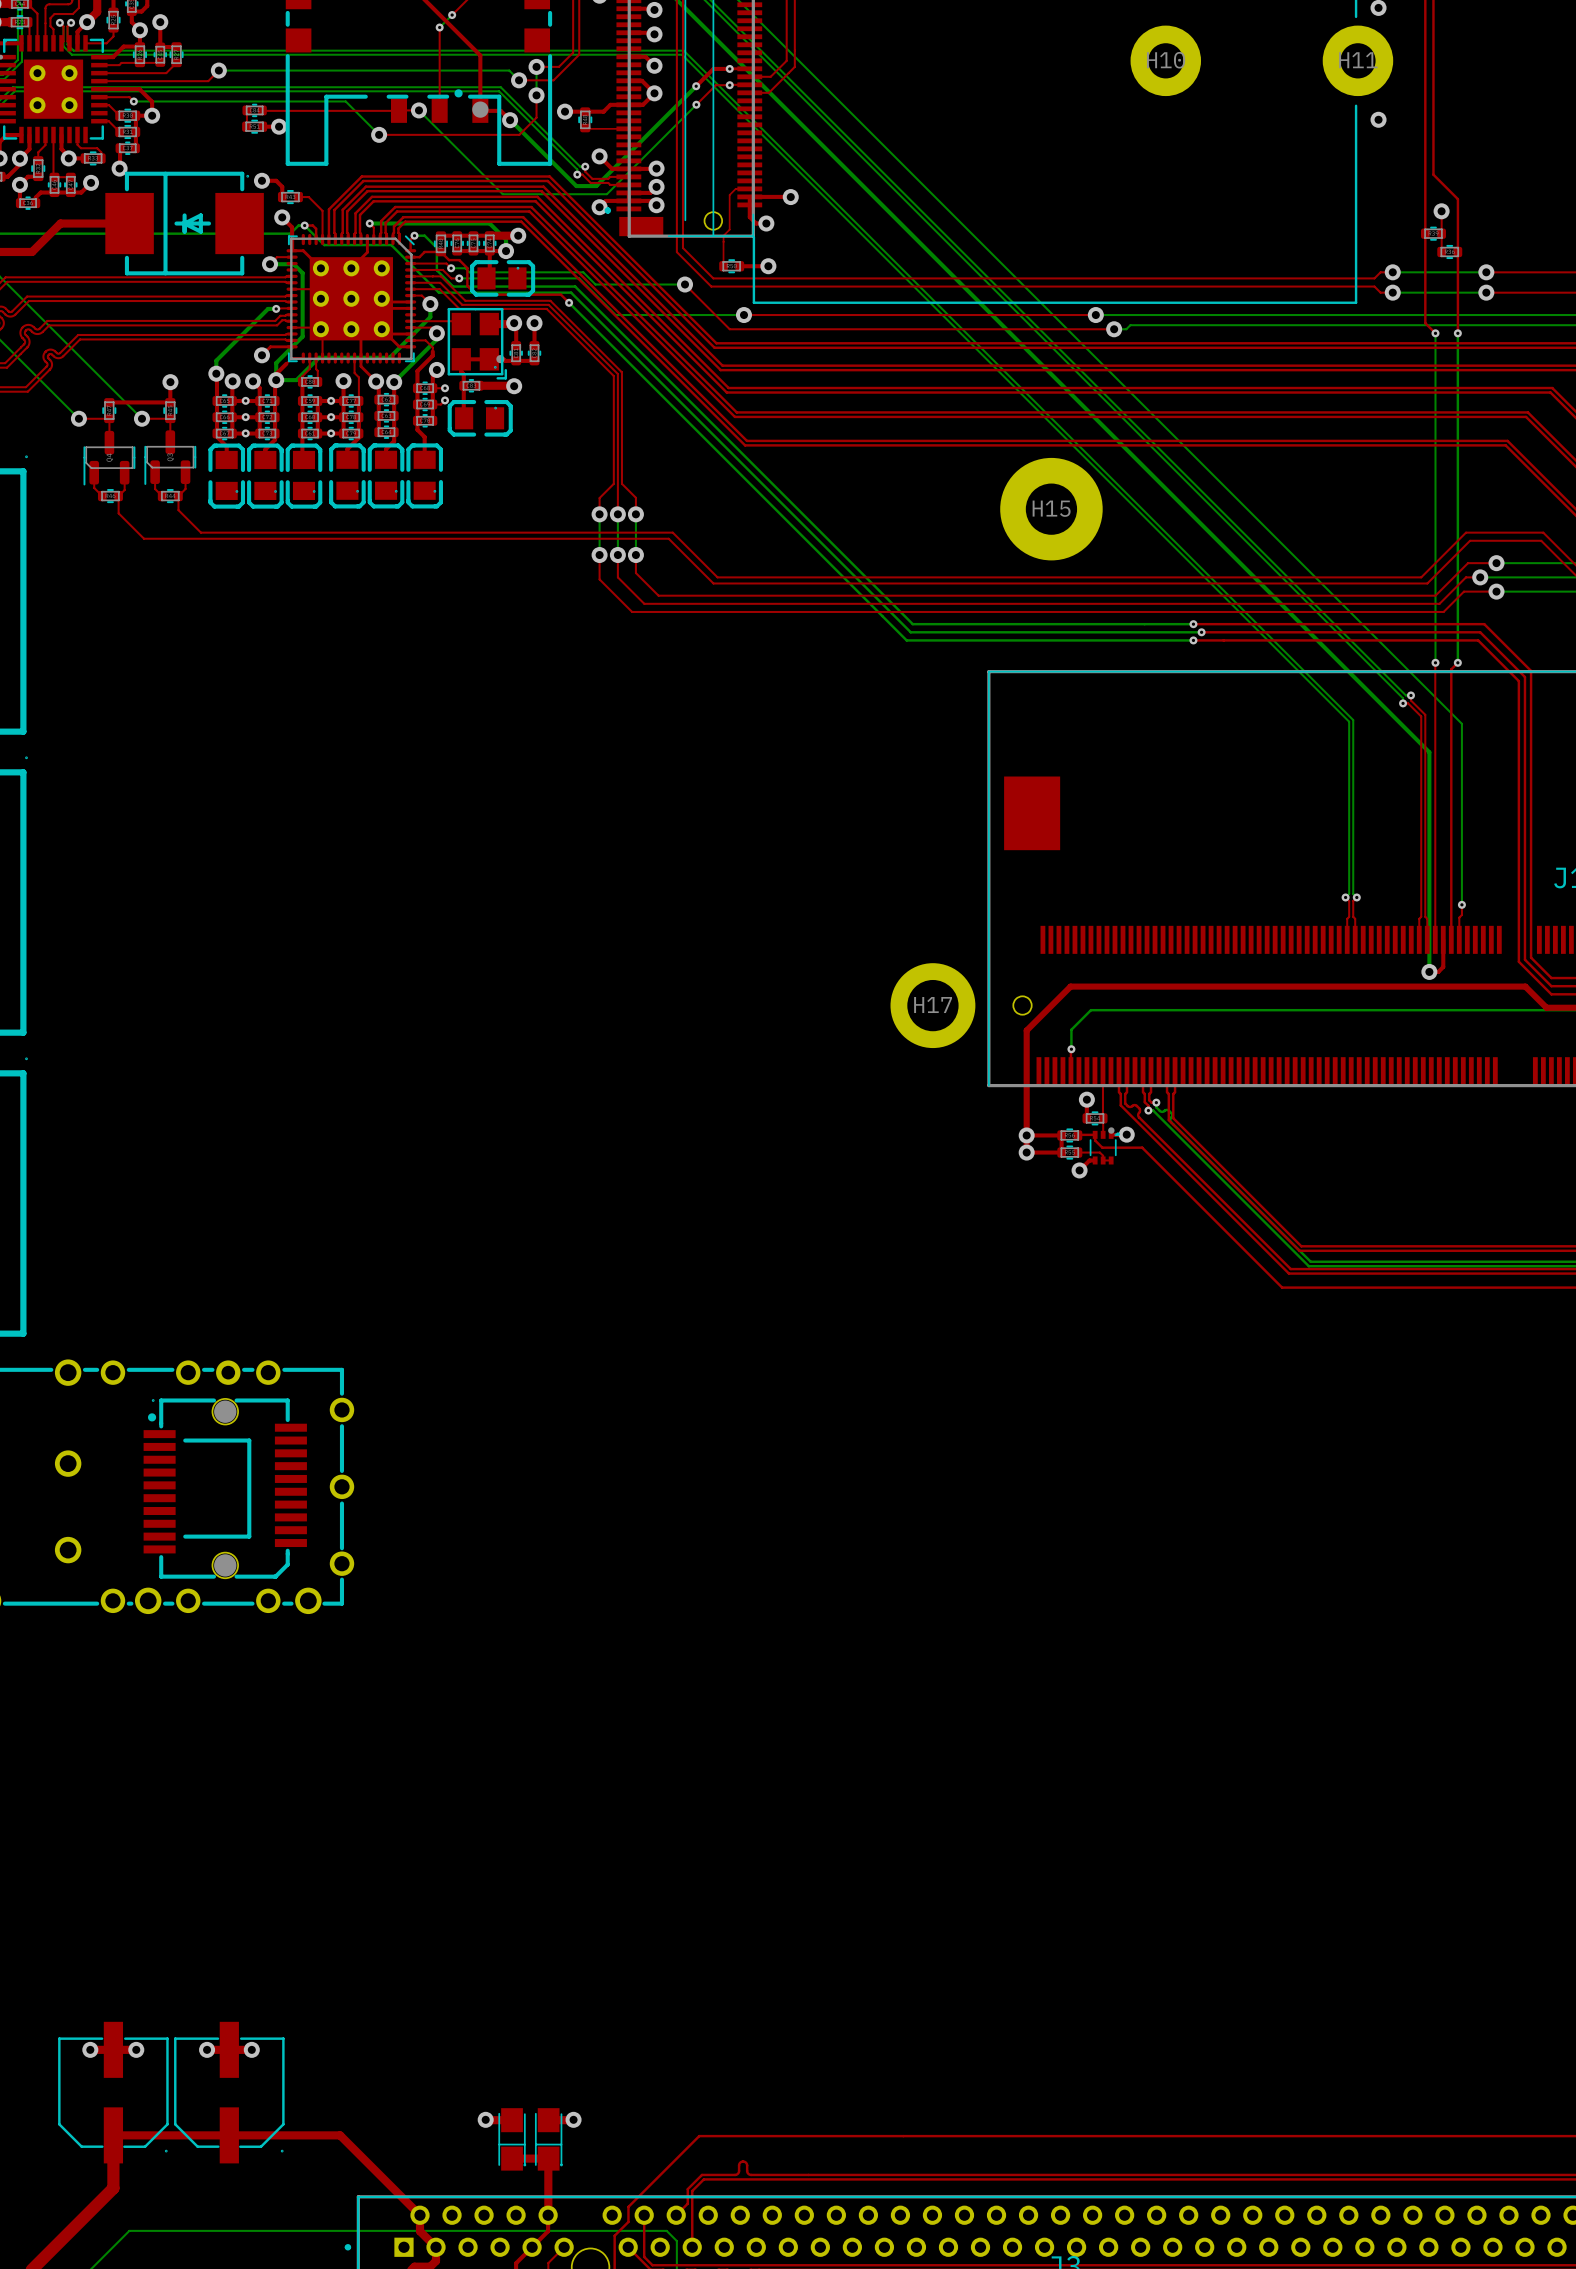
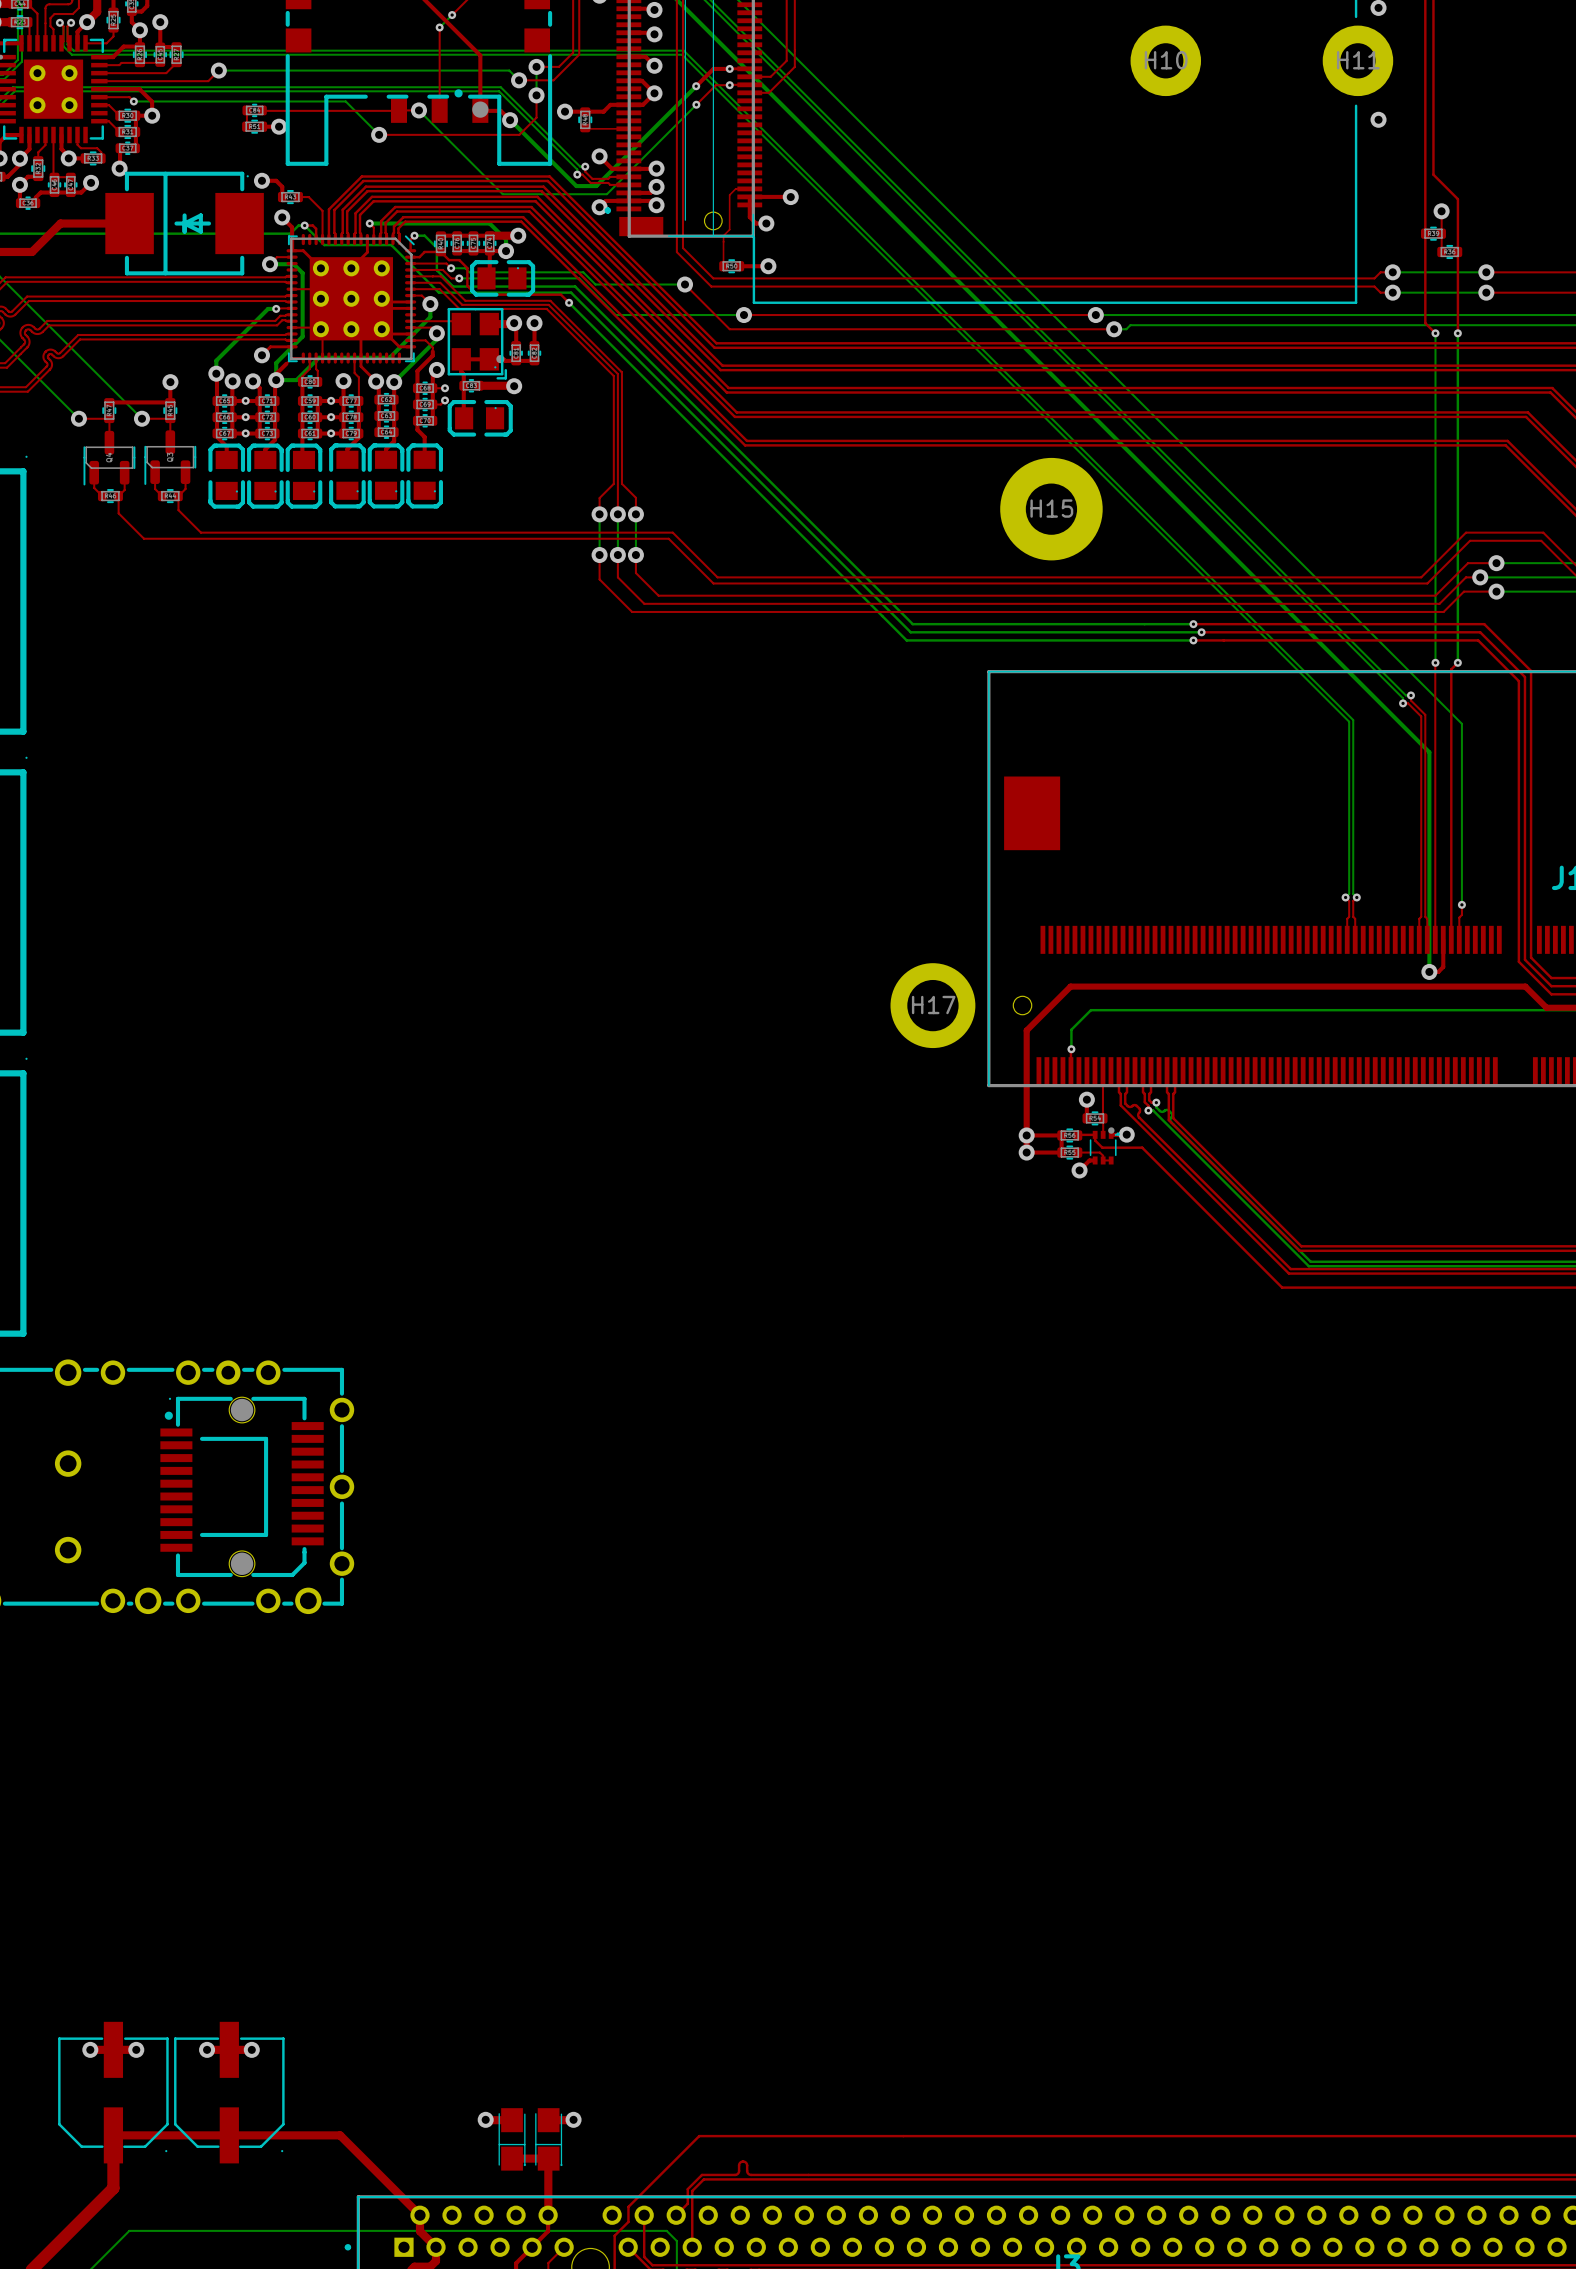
part: none -> (242, 1486)
part: (225, 1488) -> none

